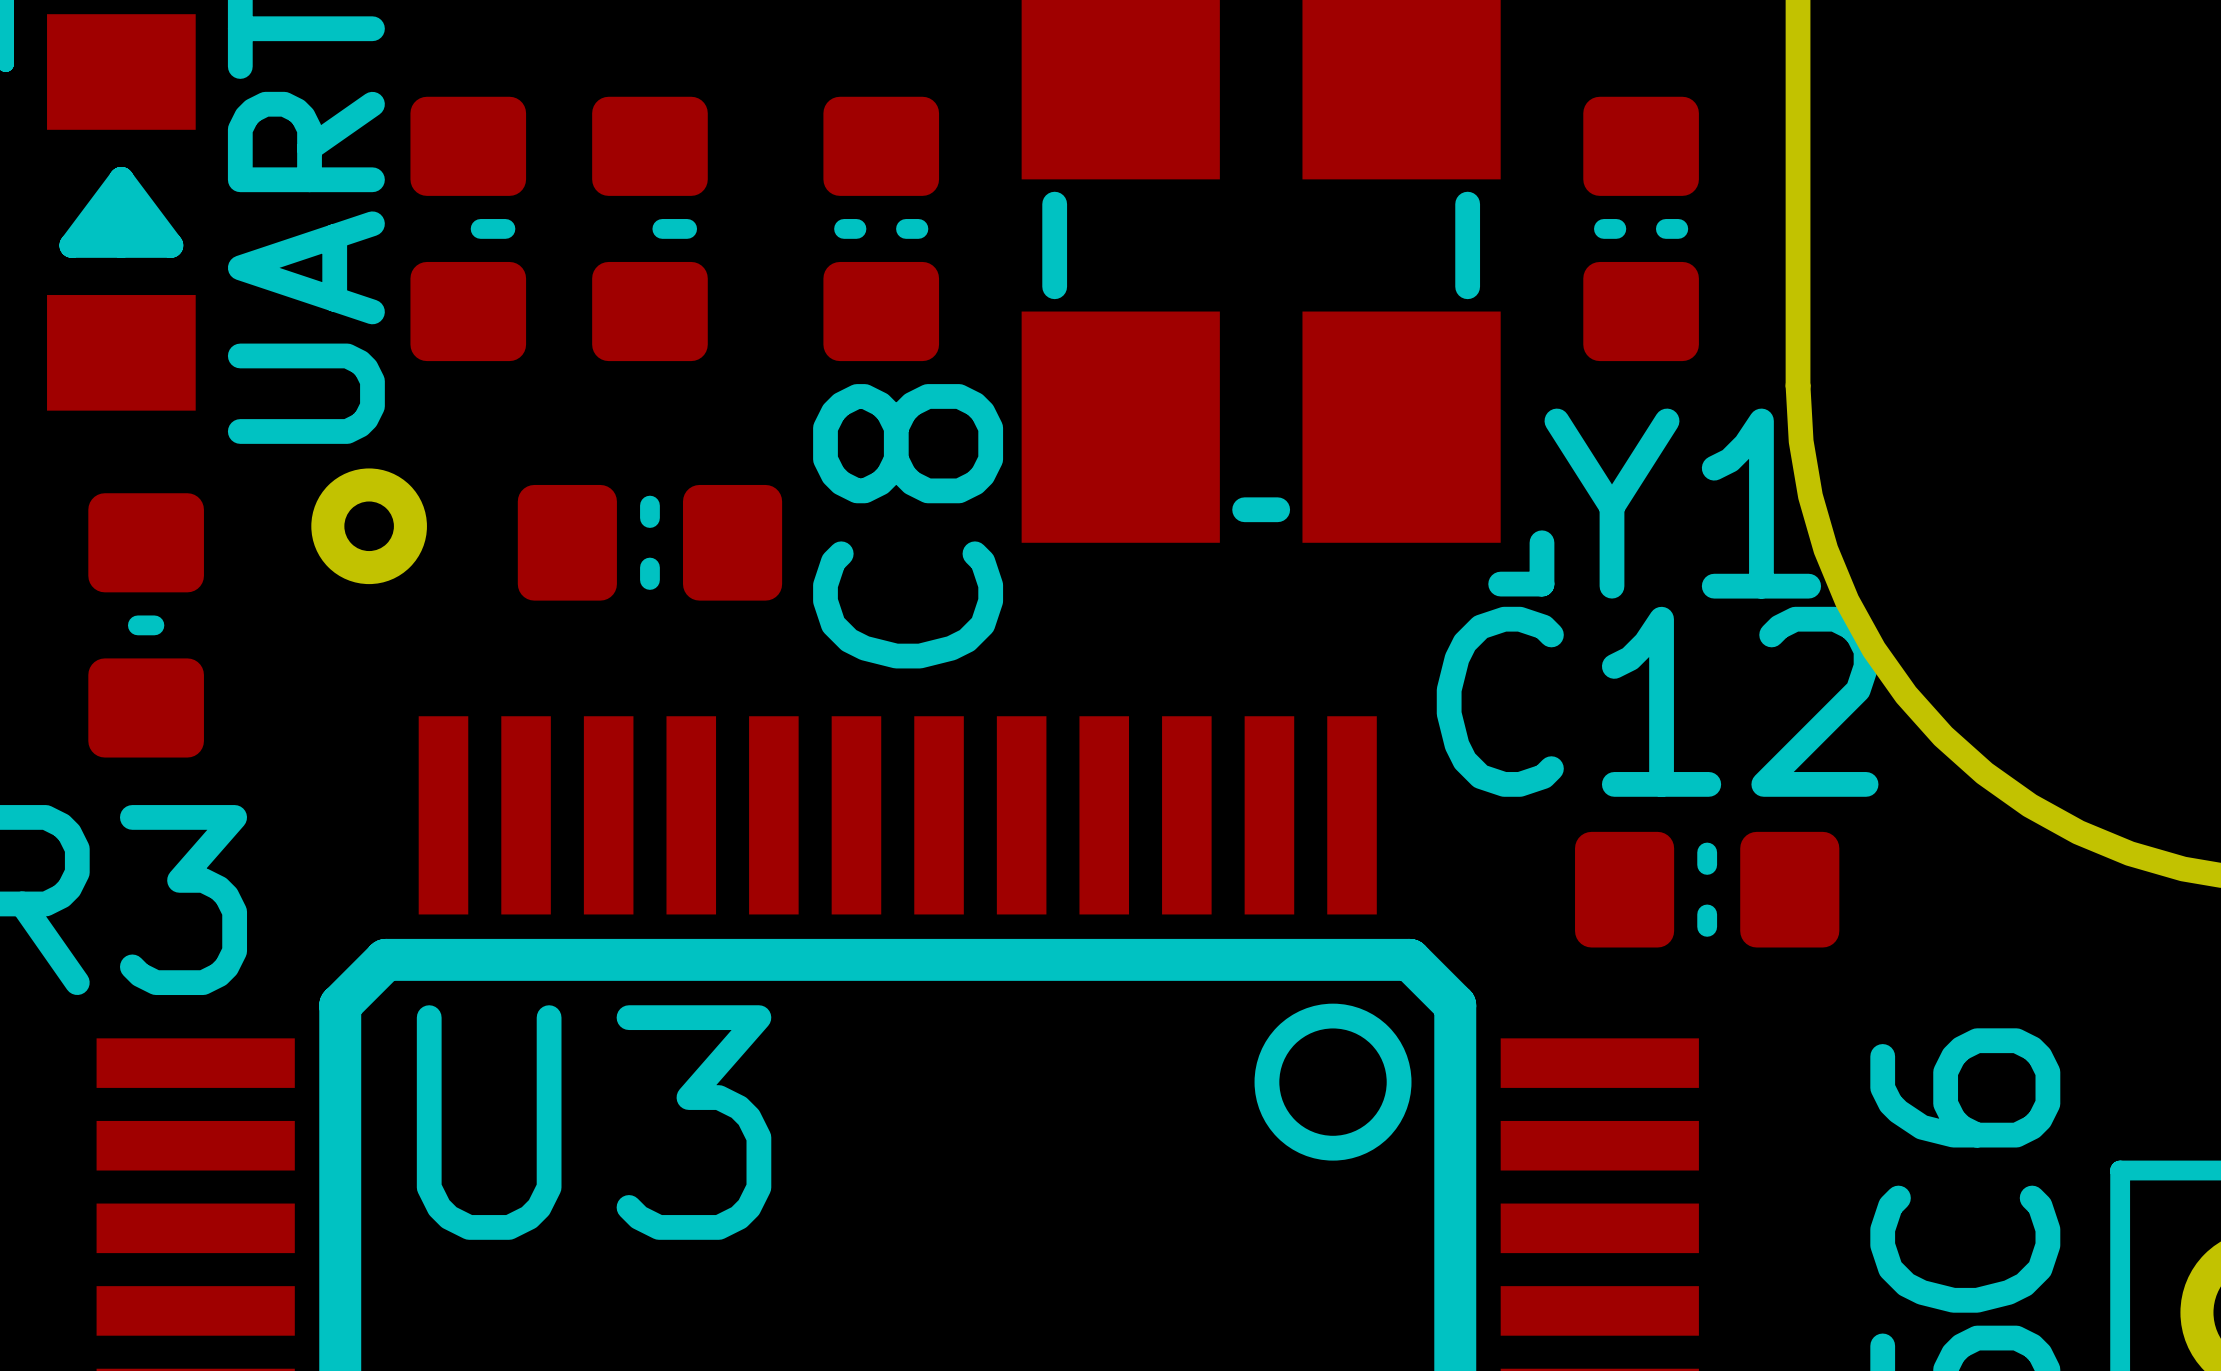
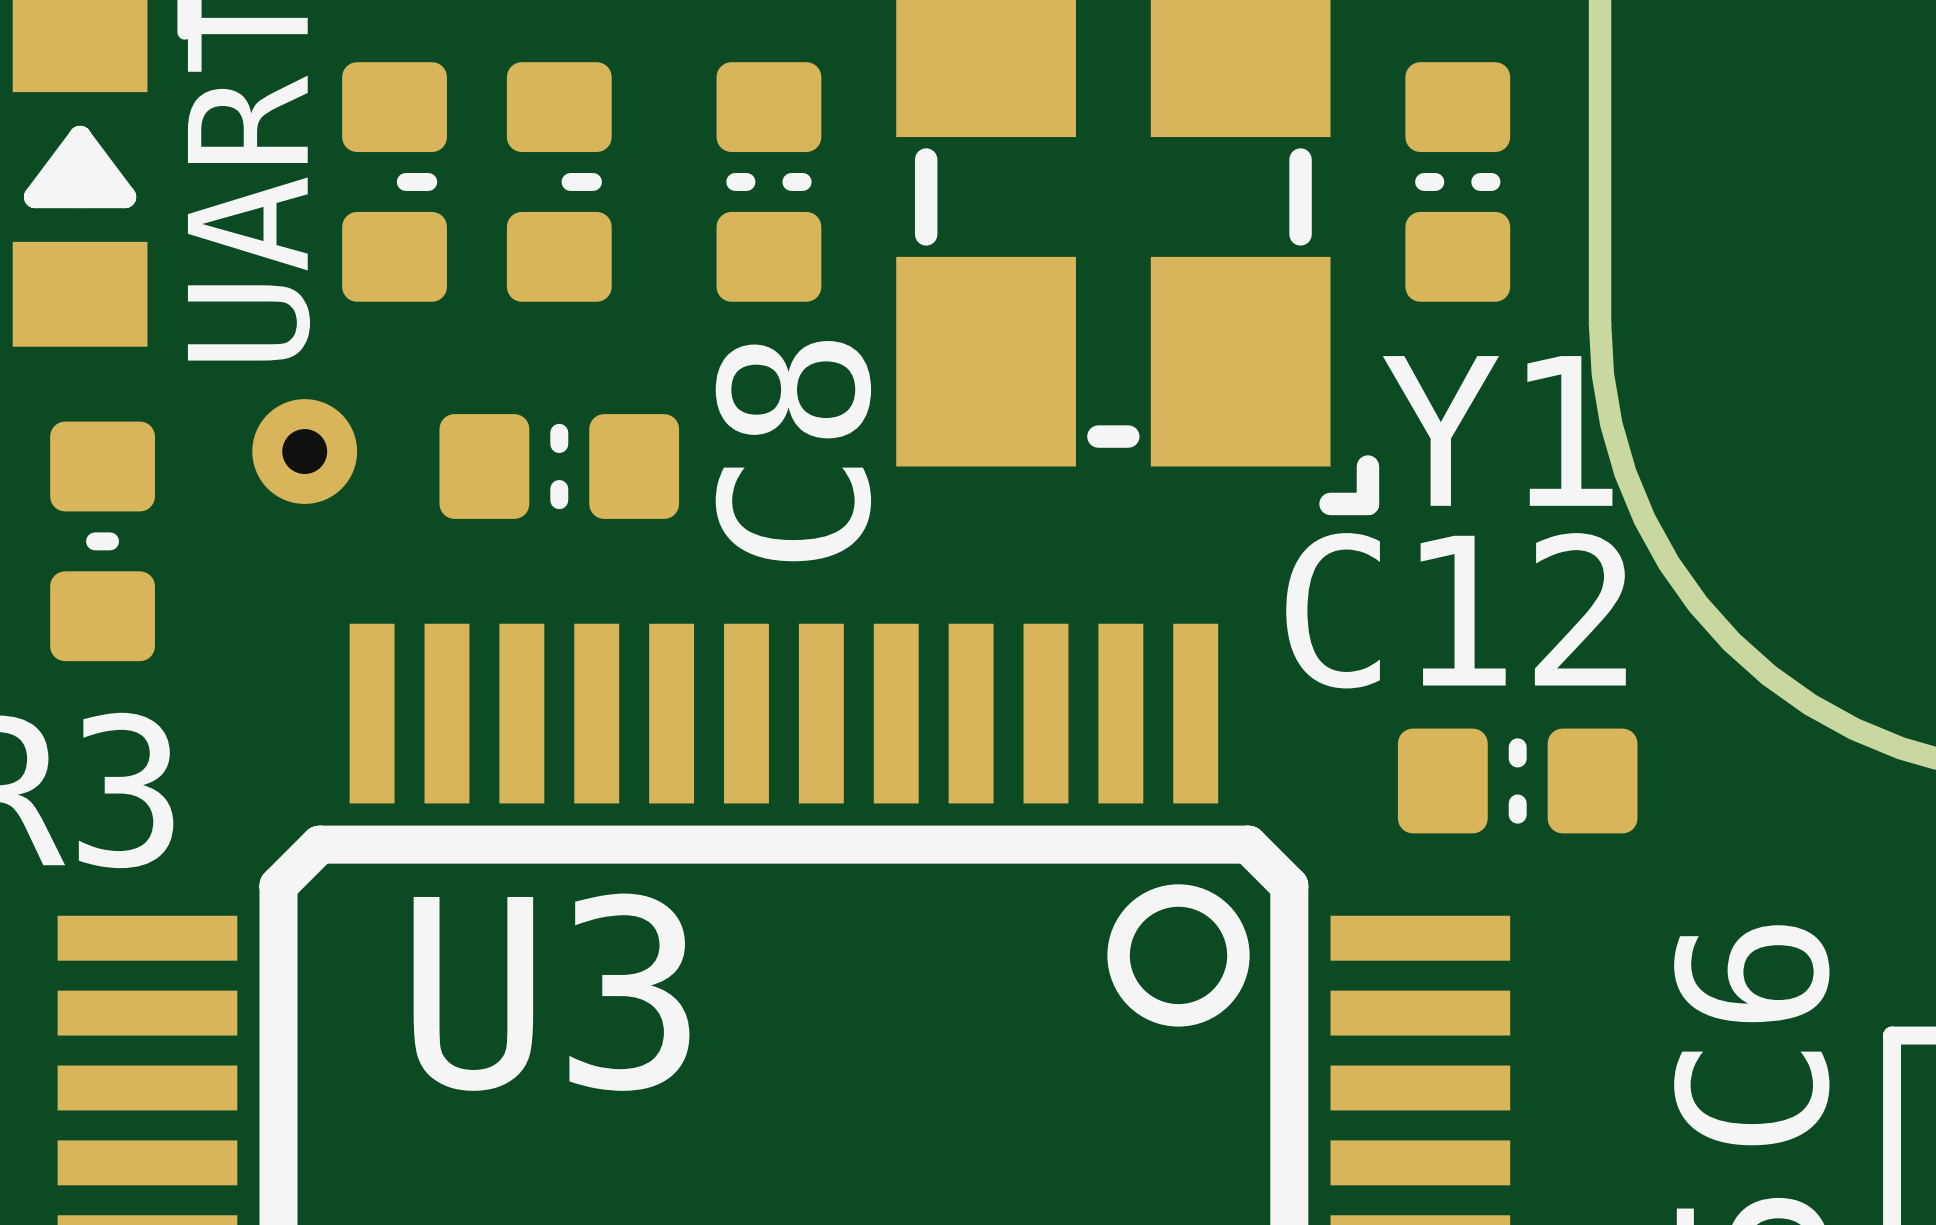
C12 name position: C12 (1657, 701) -> C12 (1456, 610)

